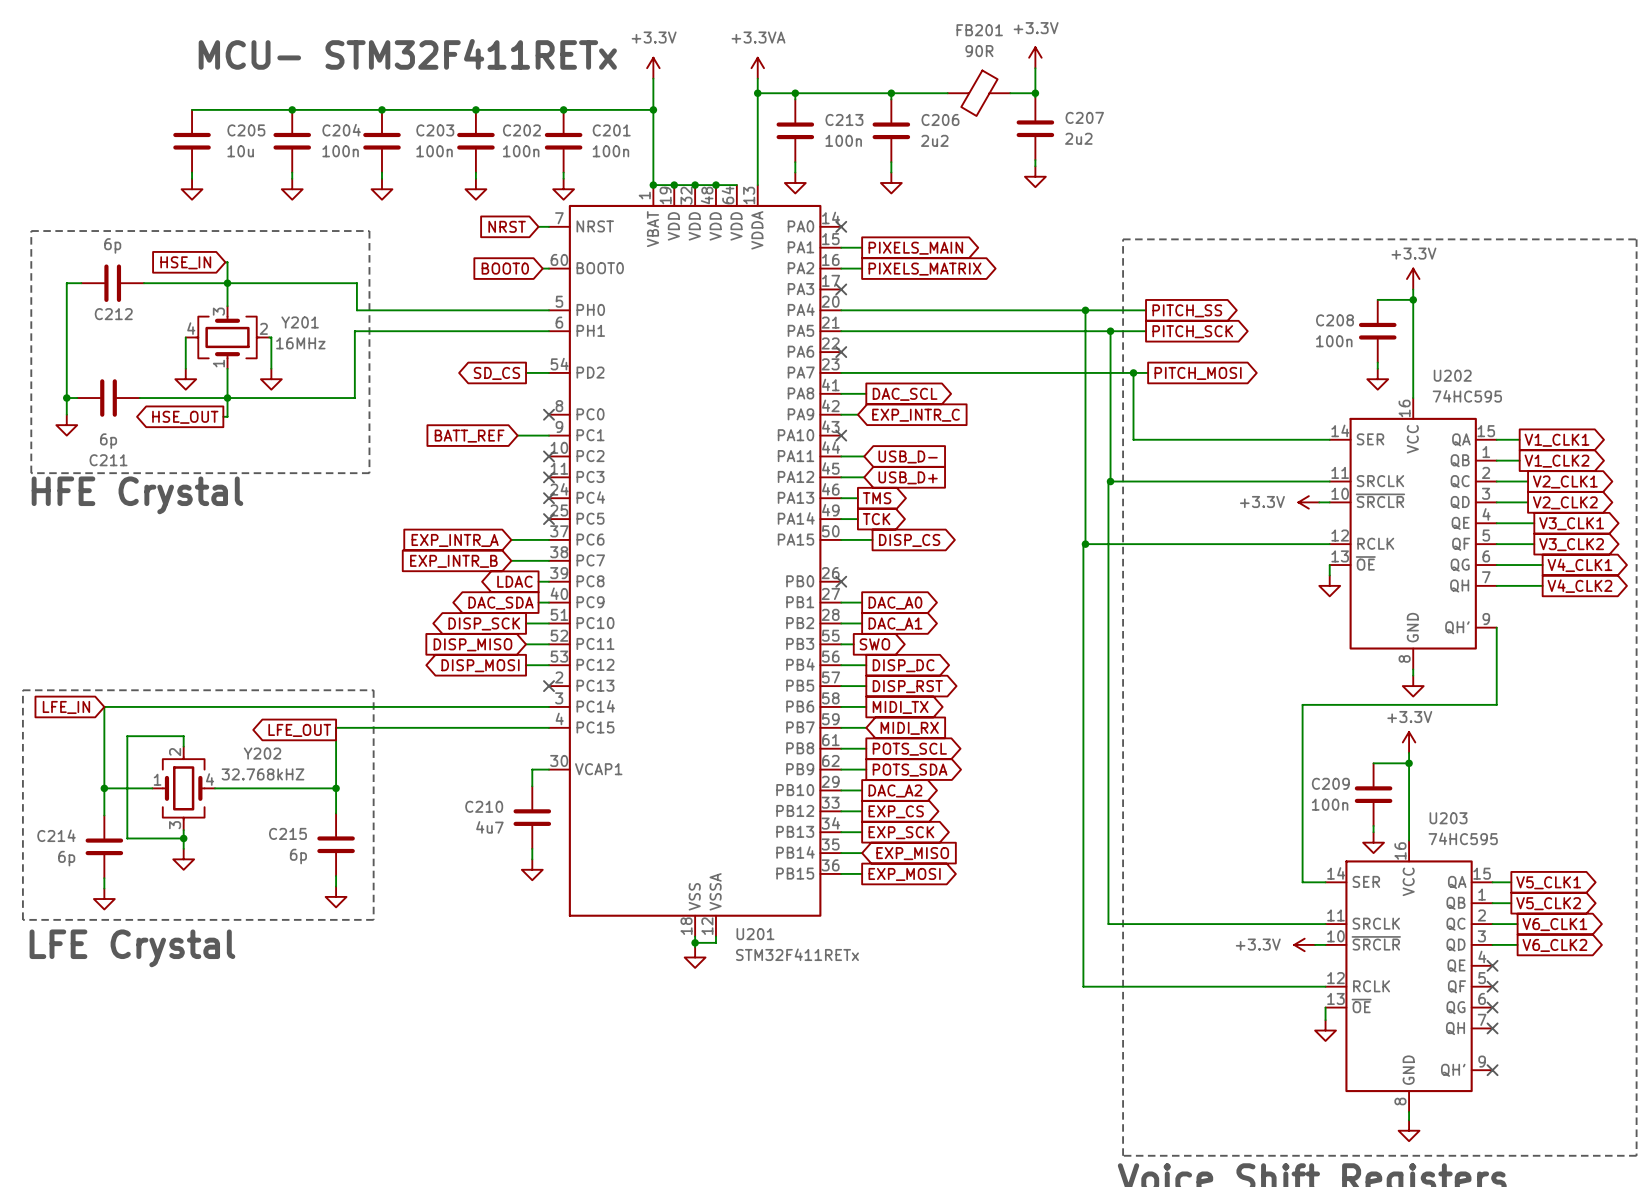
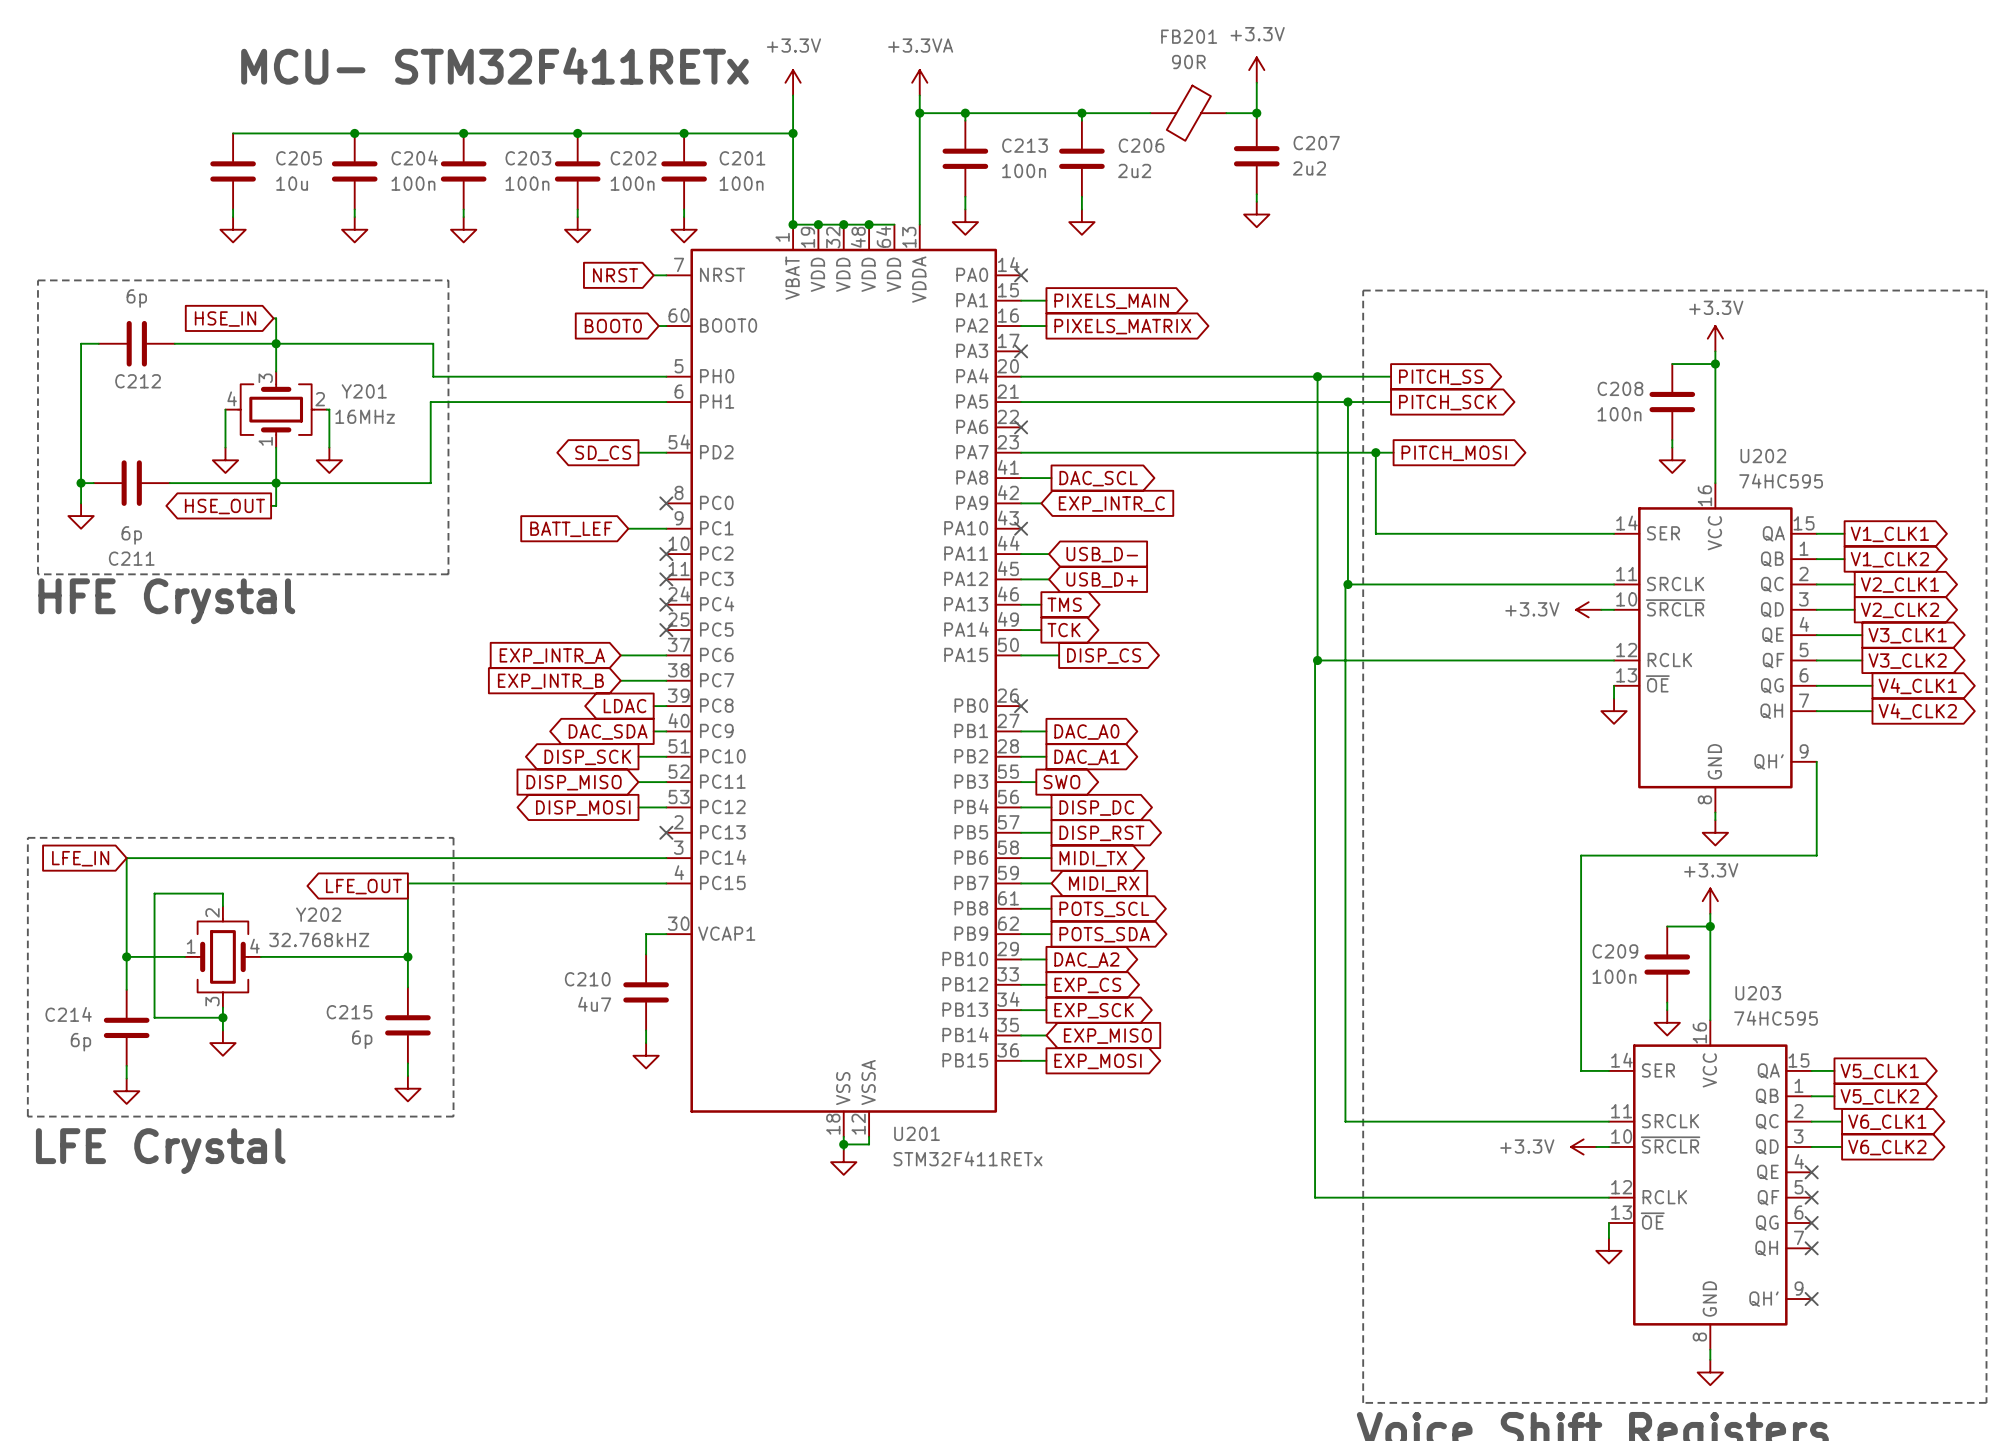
global label: BATT_REF (469, 436) -> BATT_LEF (571, 529)

